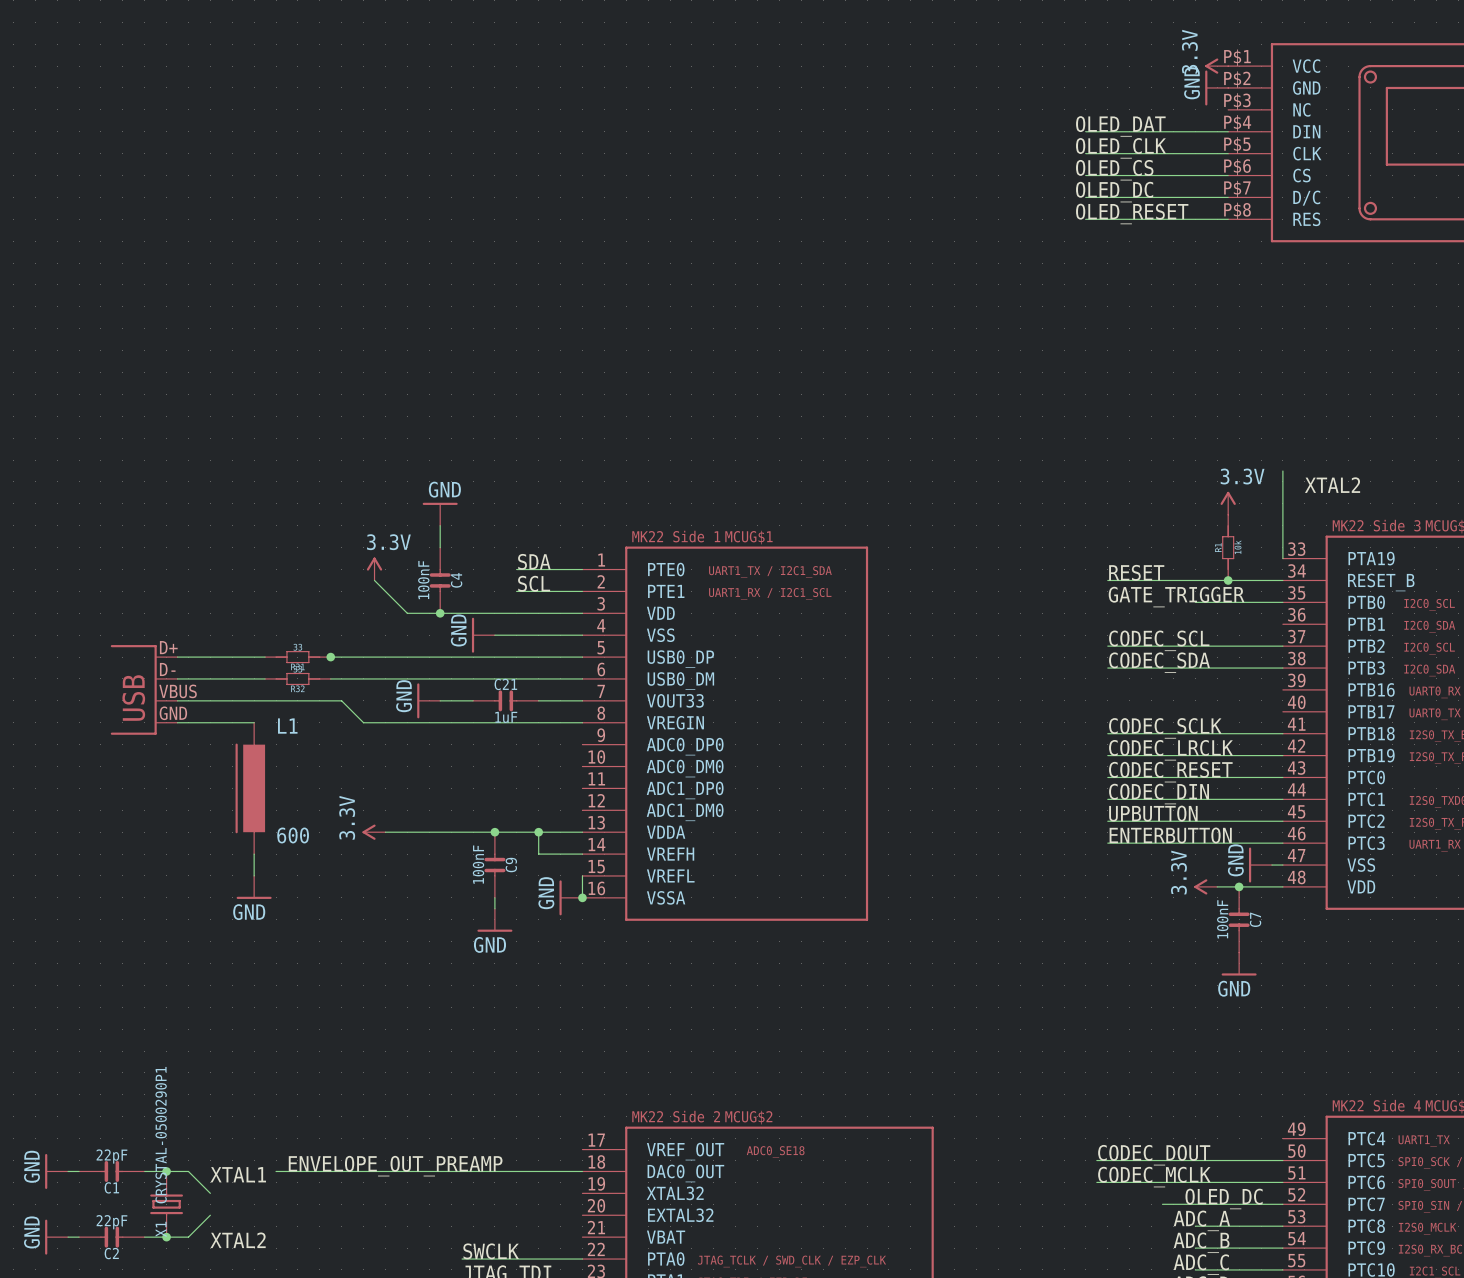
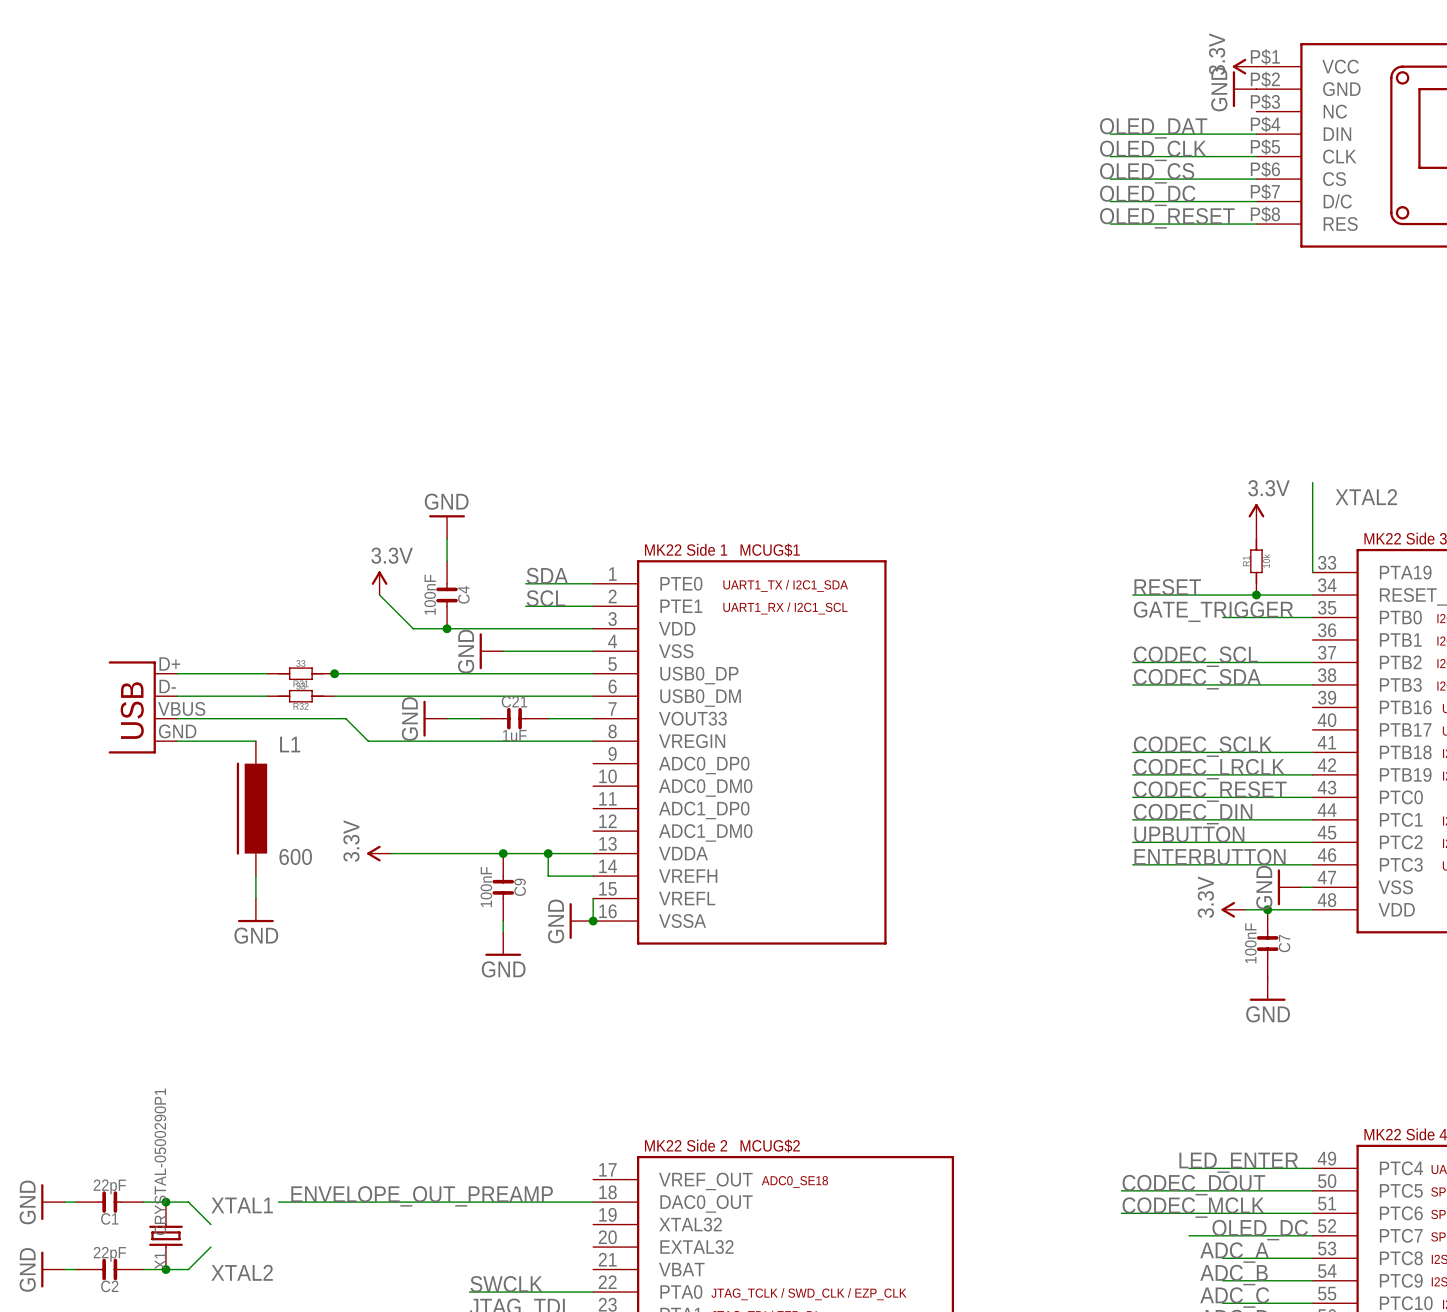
label: none -> LED_ENTER (1238, 1162)
wire: none -> (1188, 1168) (1312, 1168)

